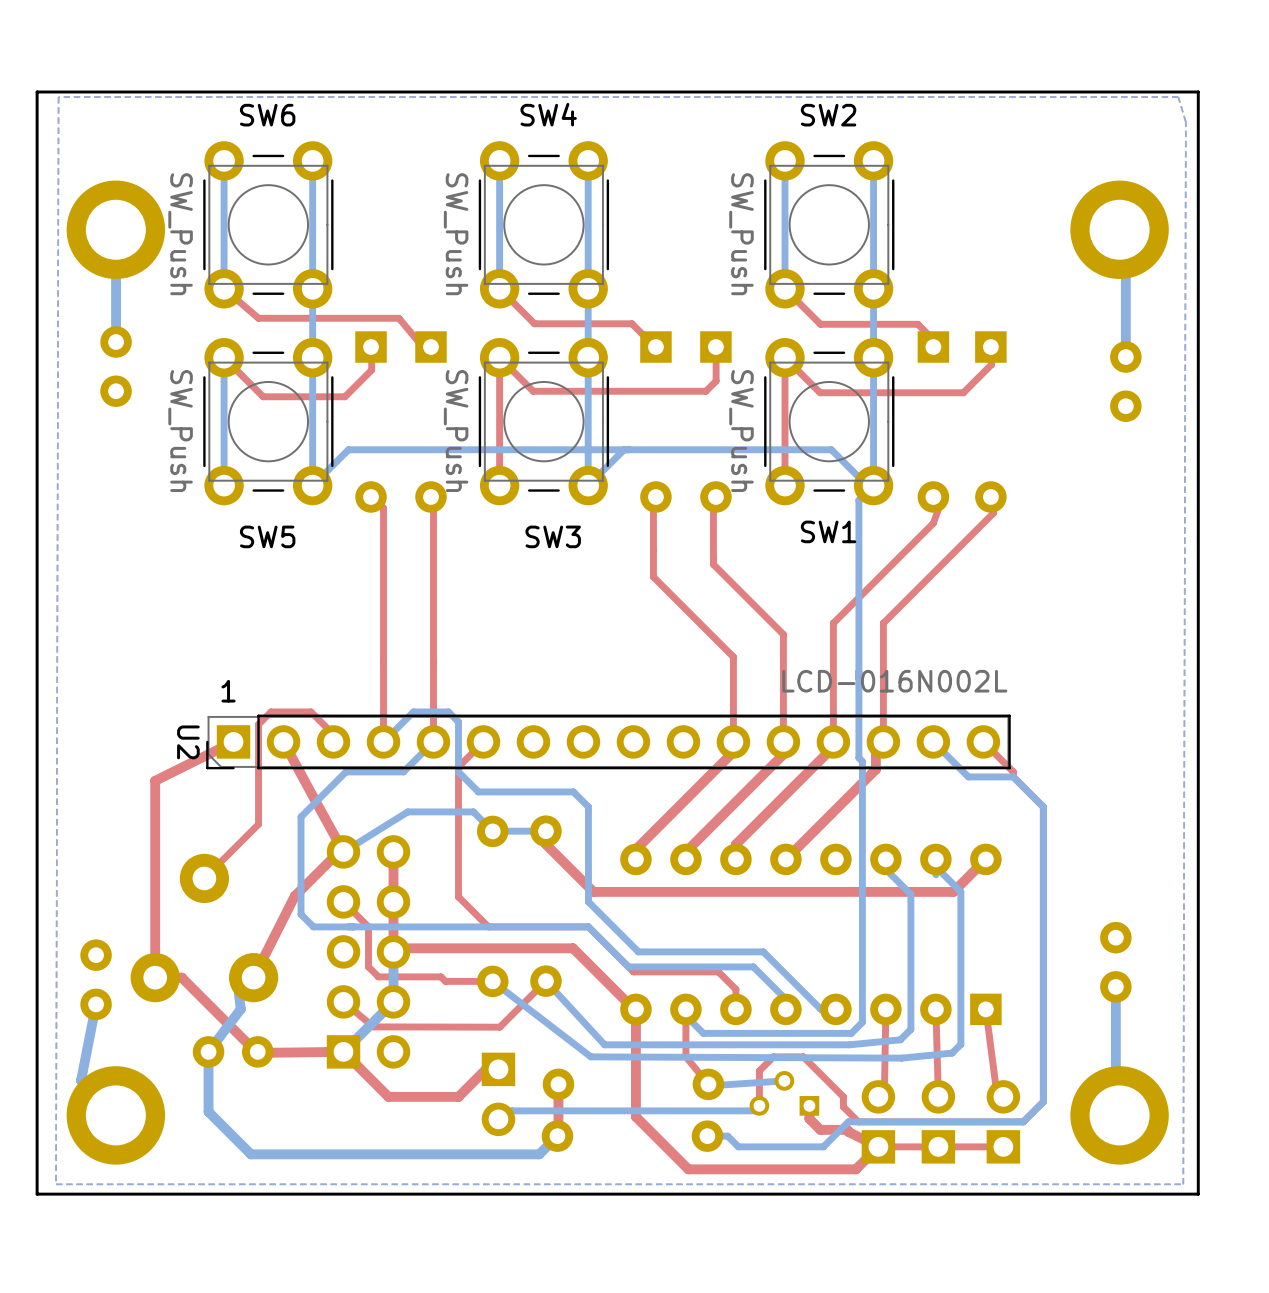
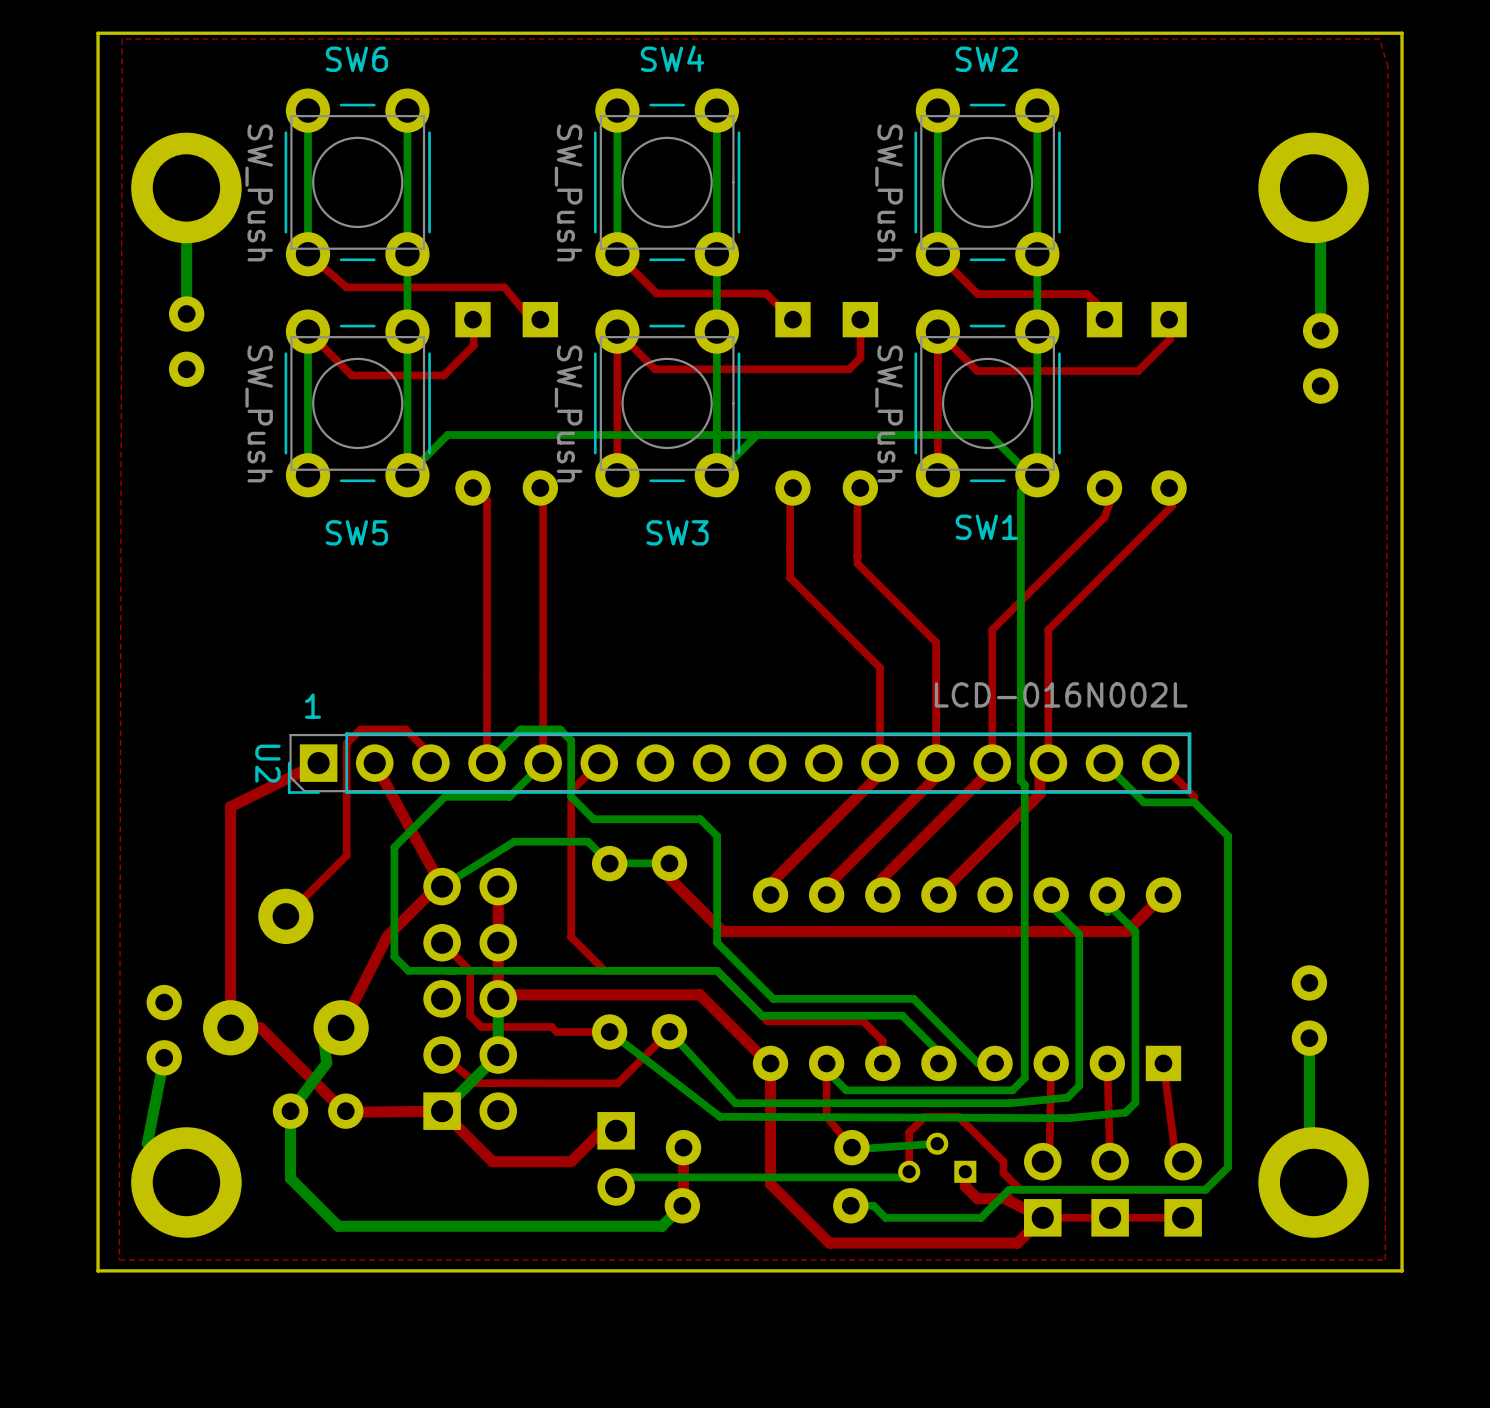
bottom zone outline: (1178, 97) (58, 97) (56, 1184) (1183, 1184) (1185, 122) (1178, 97) -> none

